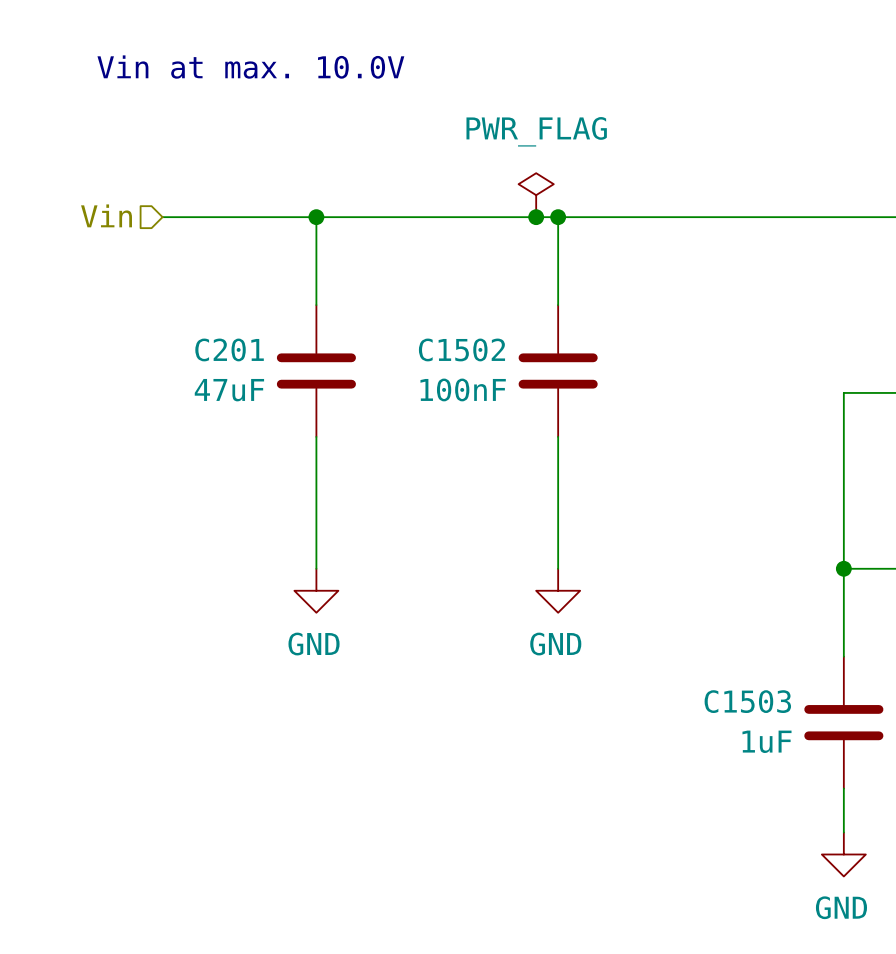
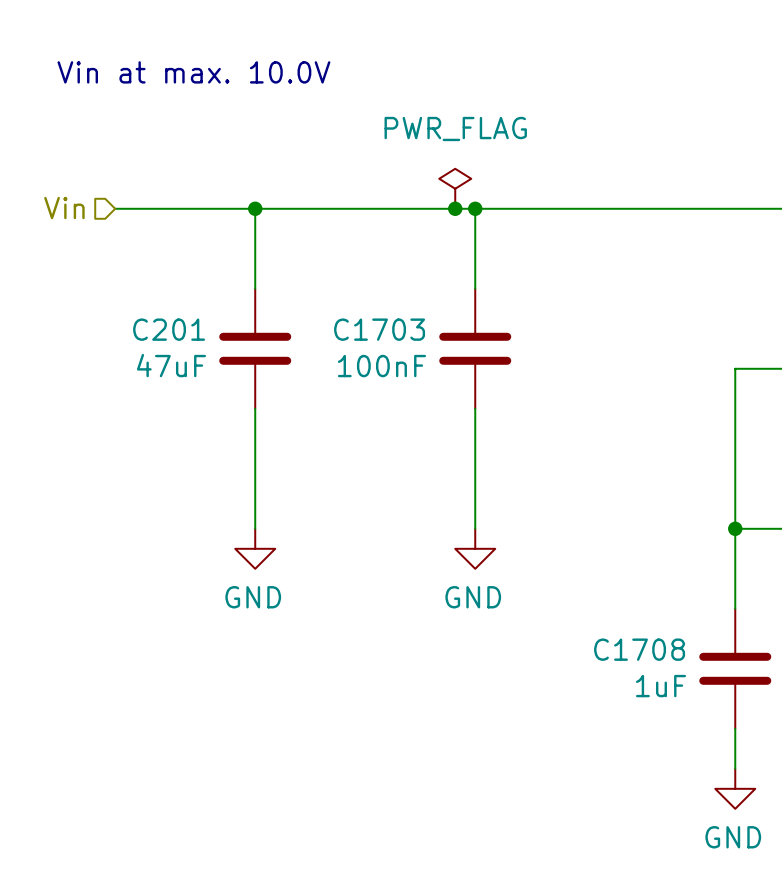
C1502 name: C1502 (461, 349) -> C1703 (379, 329)
C1503 name: C1503 (747, 701) -> C1708 (639, 649)

